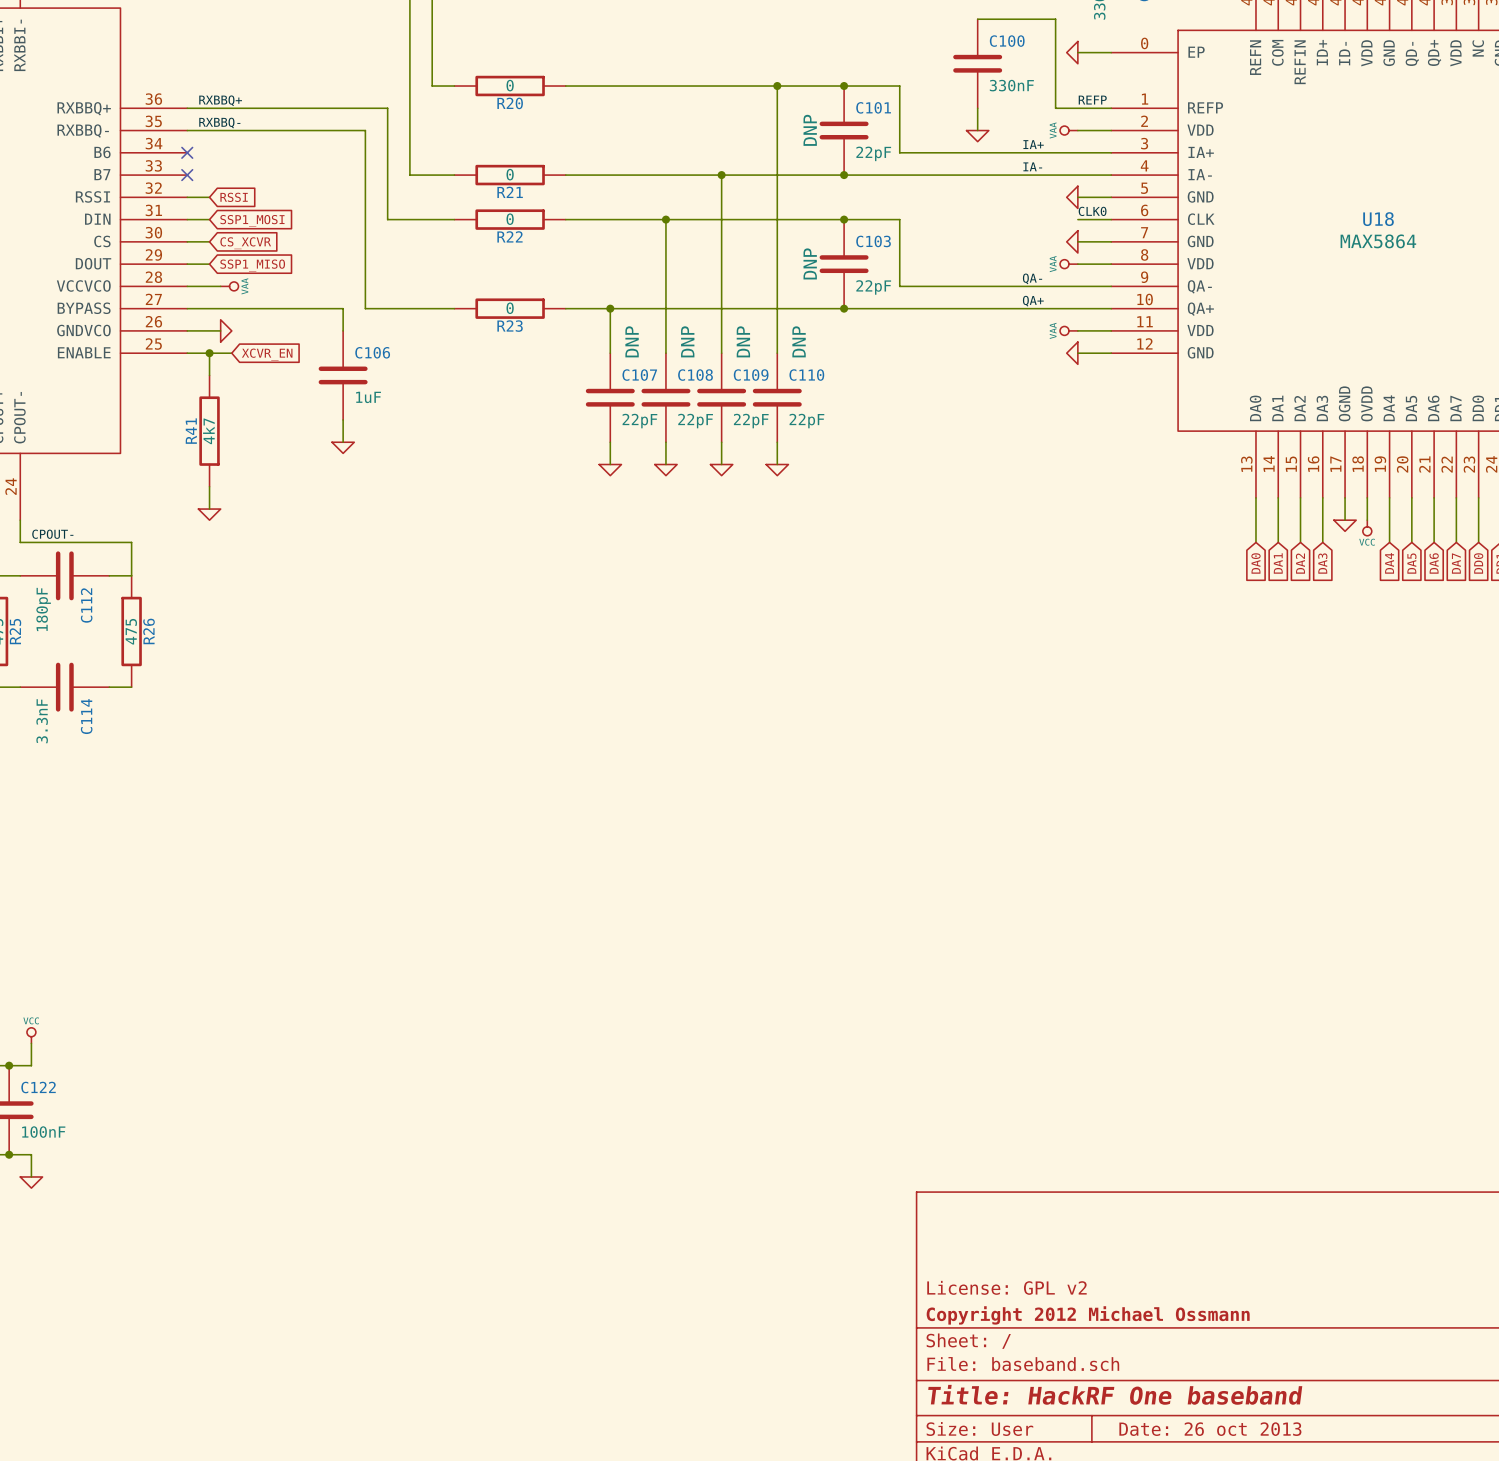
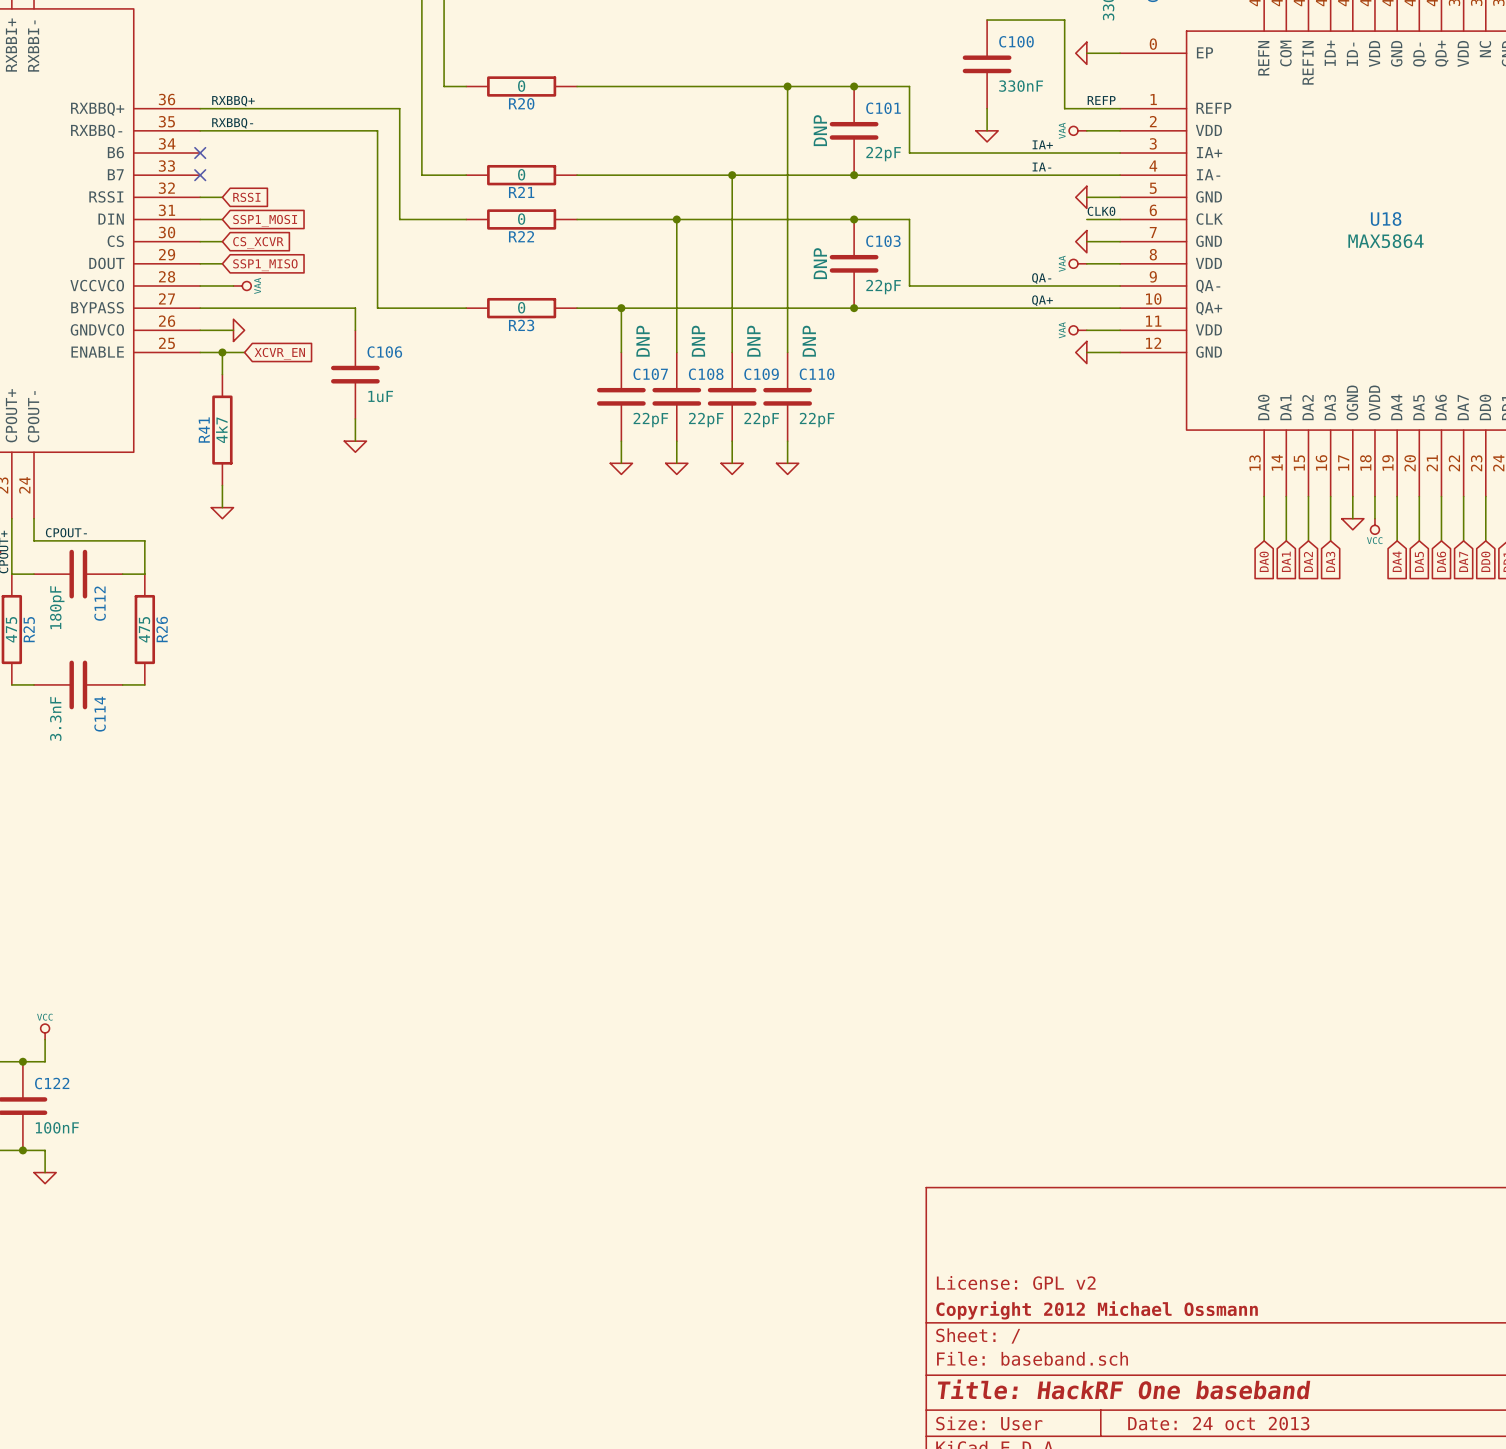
title block: Date: 26 oct 2013 (1210, 1429) -> Date: 24 oct 2013 (1218, 1423)

